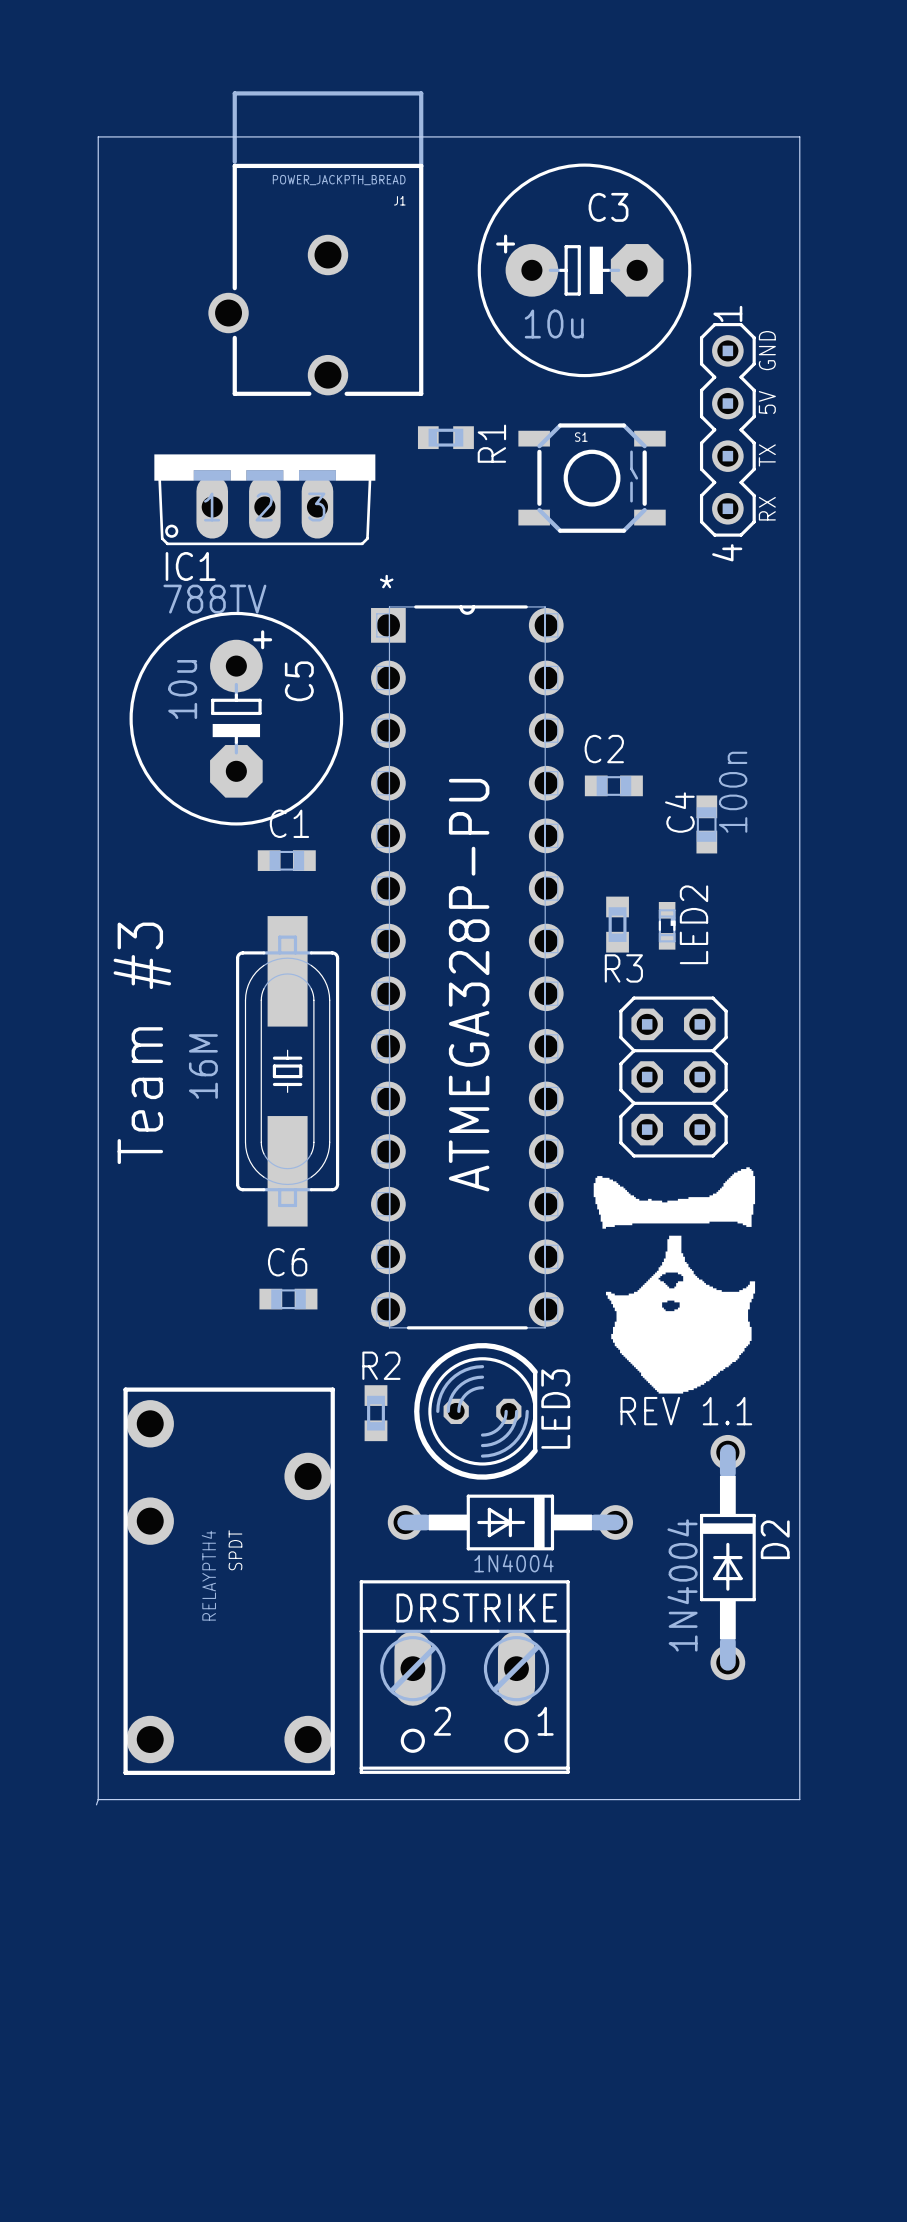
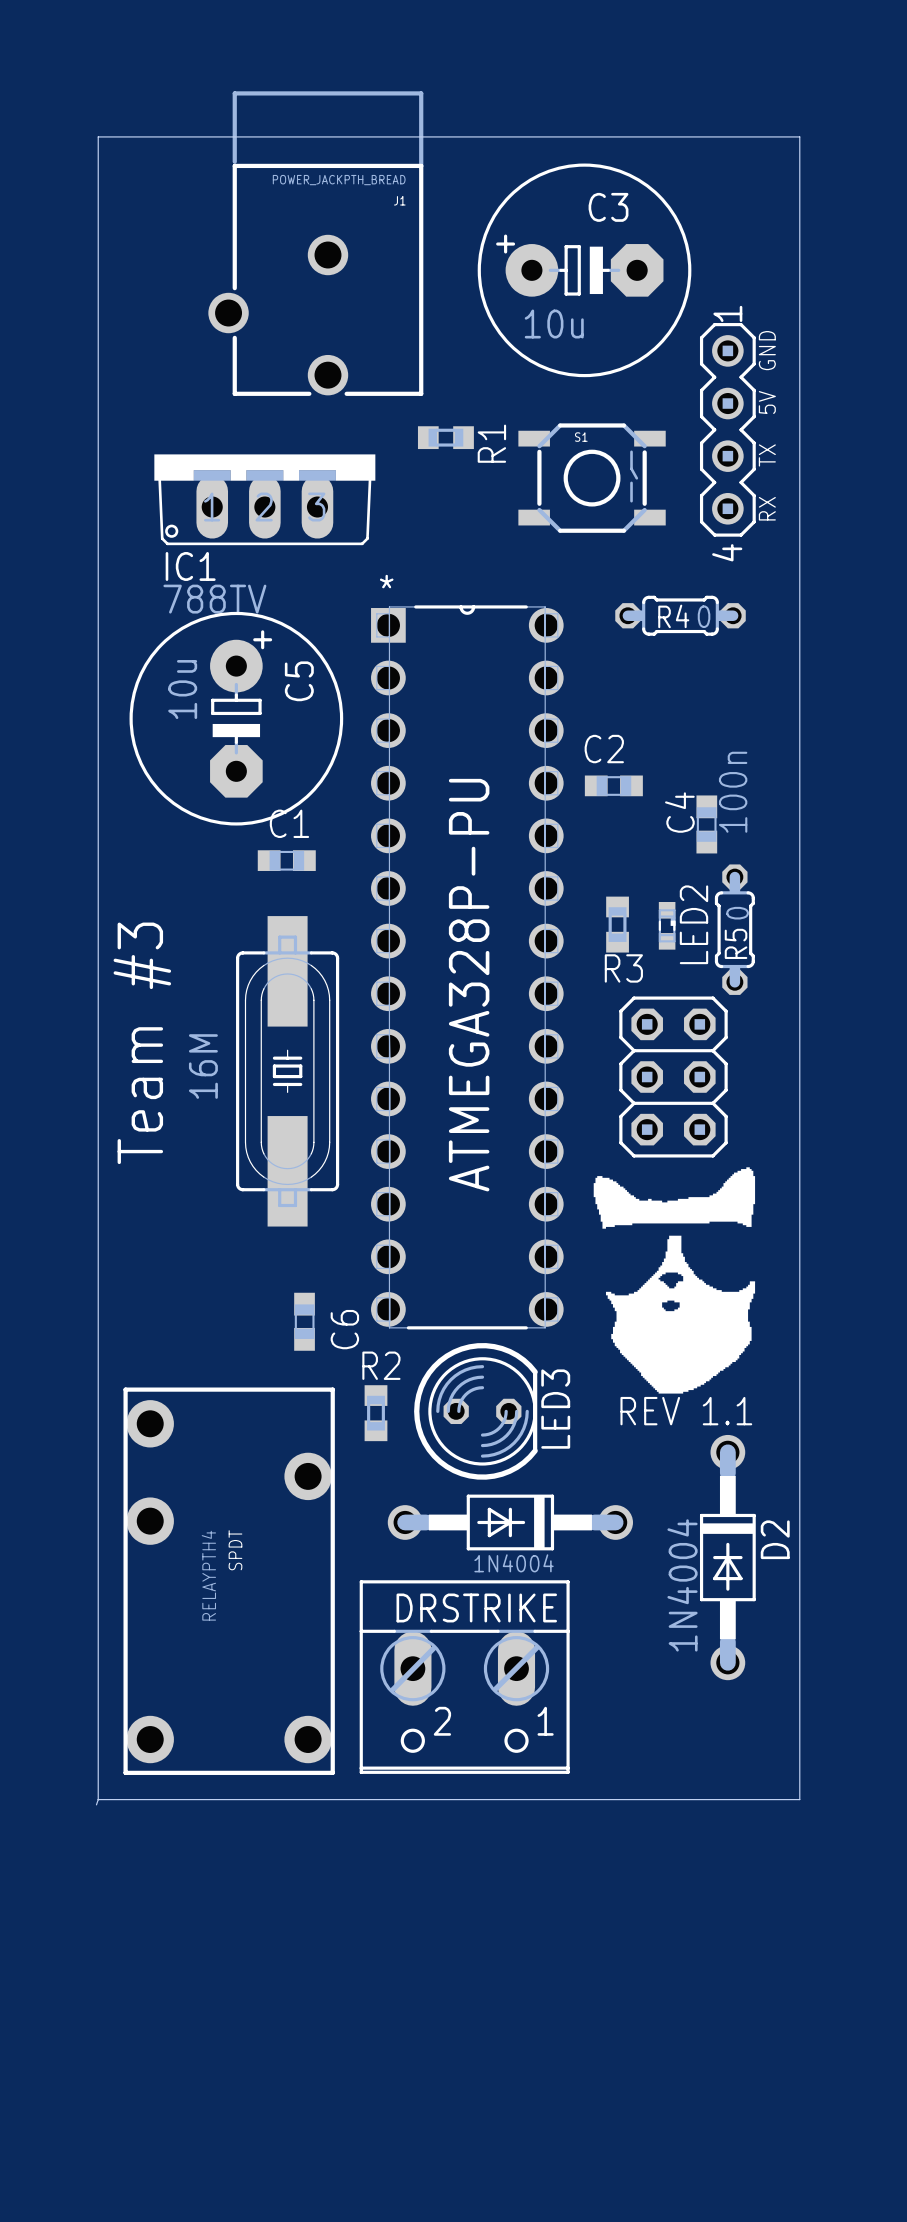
R4: none -> 0 (680, 615)
R5: none -> 0 (734, 929)
C6 rotation: 0° (288, 1299) -> 90° clockwise (304, 1321)

